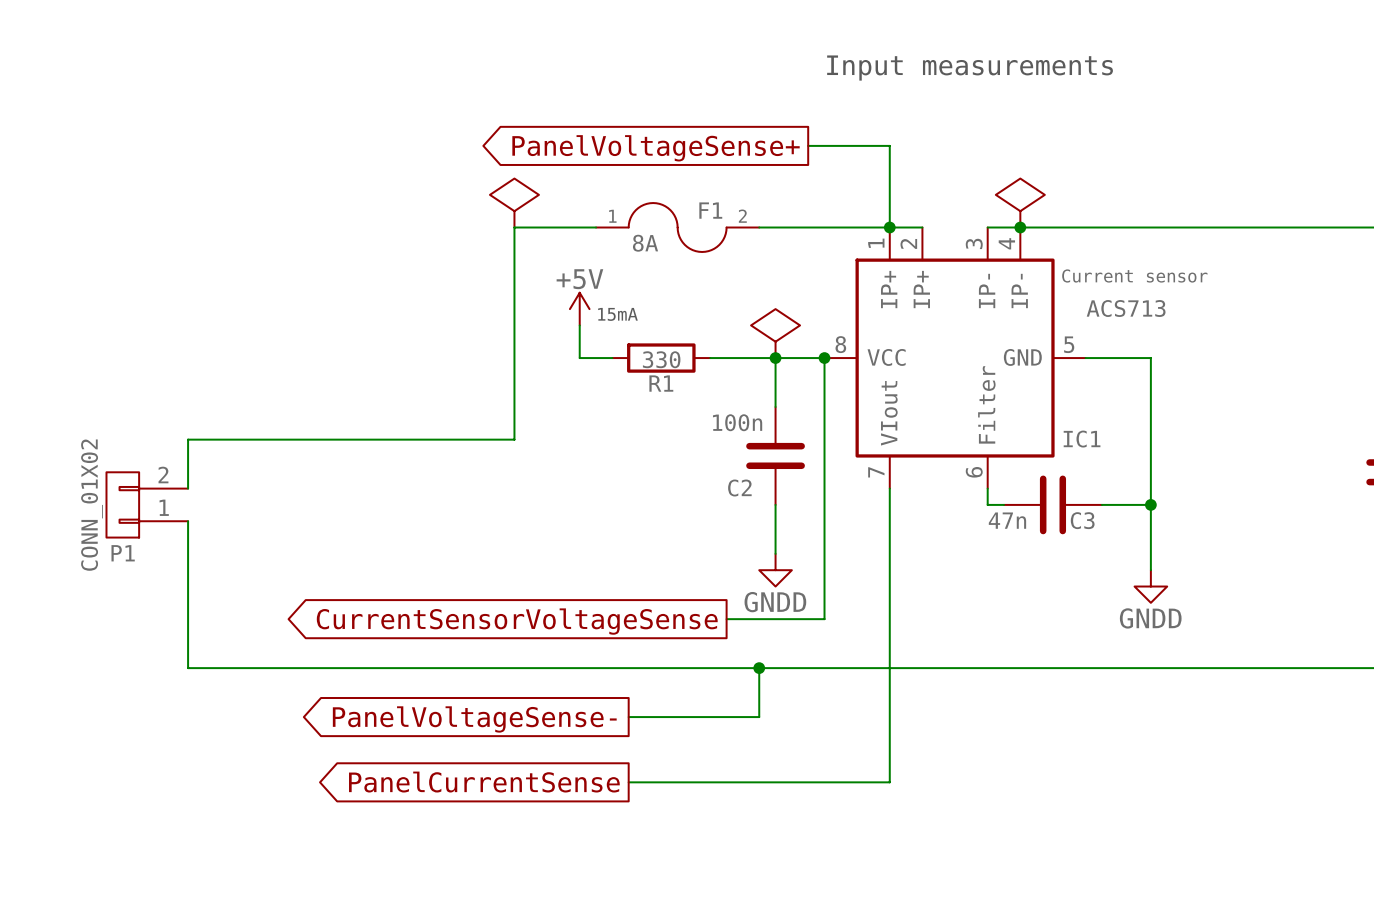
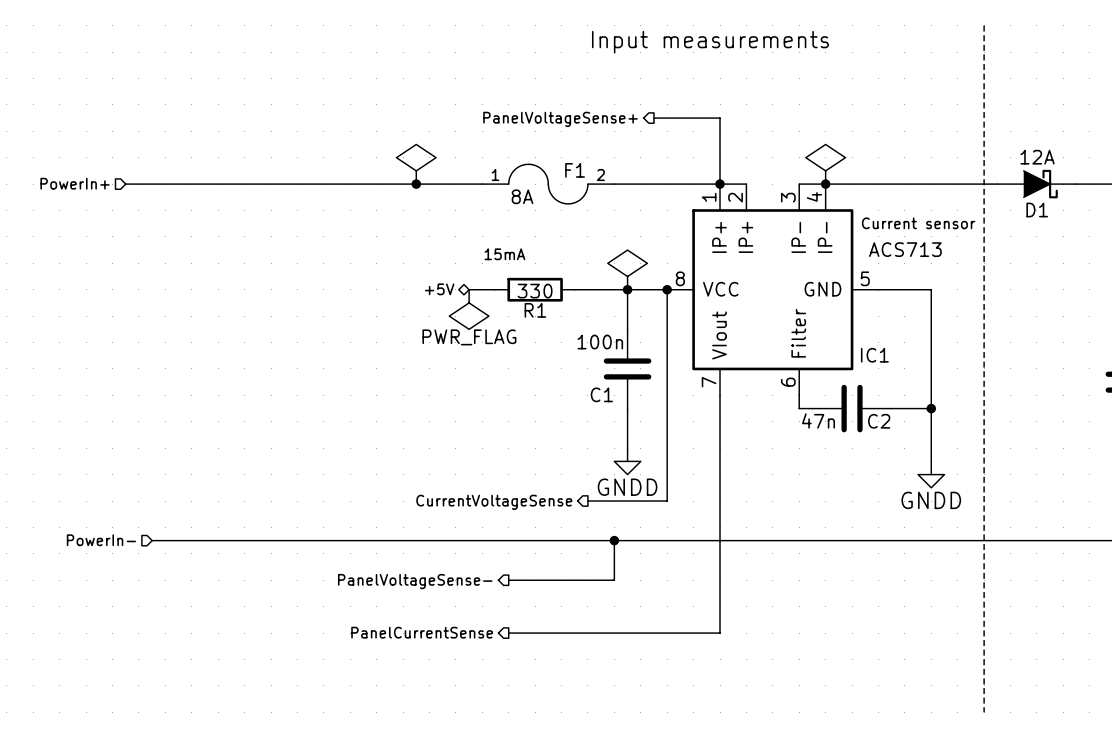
line: none -> (984, 25) (984, 712)
text position: Input measurements (970, 68) -> Input measurements (710, 42)
hierarchical label: none -> PanelVoltageSense+ (560, 119)
global label: PanelVoltageSense+ (656, 148) -> none
hierarchical label: none -> PowerIn+ (75, 183)
wire: (514, 227) (514, 439) (188, 439) (188, 488) -> (416, 184) (125, 184)
junction: none -> (416, 184)
D1: none -> 12A (1036, 184)
power symbol: +5V (579, 309) -> none
wire: (579, 325) (579, 358) -> none
hierarchical label: none -> +5V (439, 289)
power symbol: none -> PWR_FLAG (469, 309)
C2 name: C2 (739, 488) -> C1 (601, 394)
P1: CONN_01X02 (147, 504) -> none
C3 name: C3 (1082, 520) -> C2 (879, 421)
wire: (188, 521) (188, 668) -> none
hierarchical label: none -> CurrentVoltageSense (494, 502)
global label: CurrentSensorVoltageSense (517, 621) -> none
hierarchical label: none -> PowerIn- (101, 540)
hierarchical label: none -> PanelVoltageSense- (415, 581)
global label: PanelVoltageSense- (474, 719) -> none
hierarchical label: none -> PanelCurrentSense (422, 632)
global label: PanelCurrentSense (484, 782) -> none

